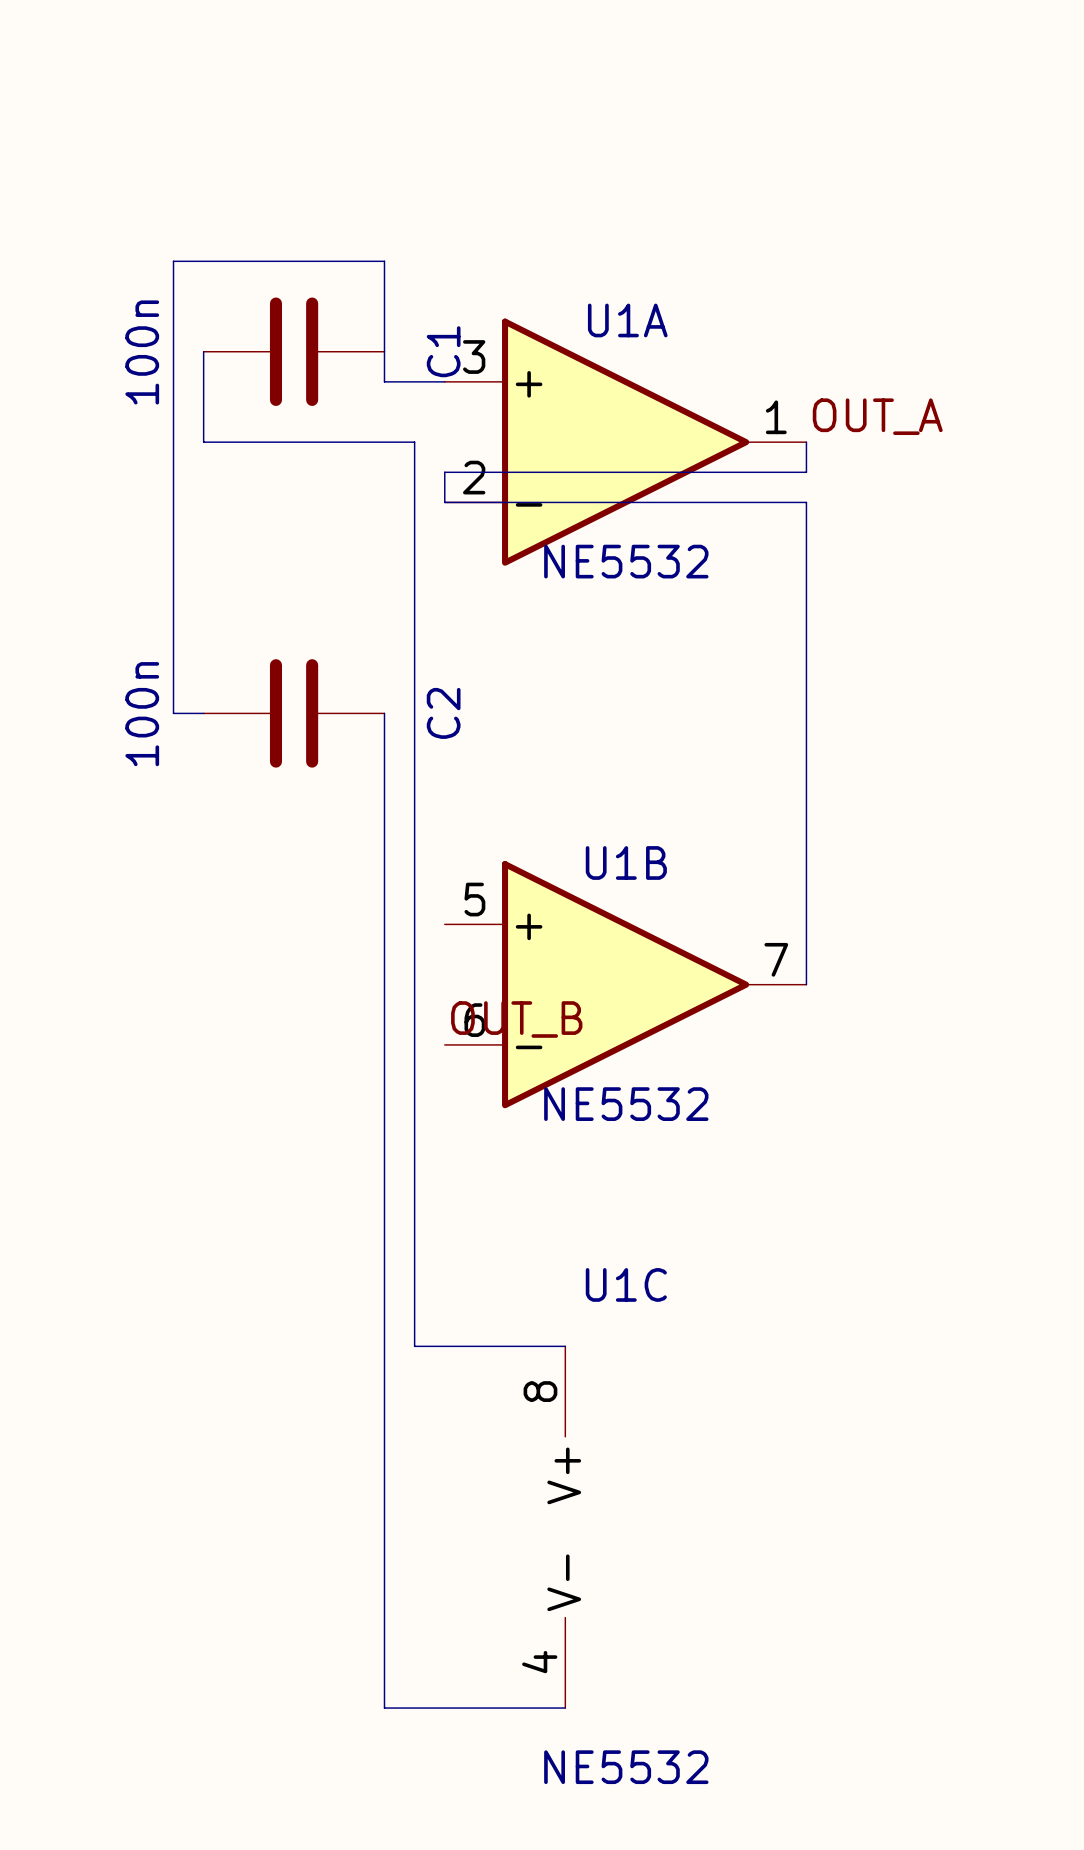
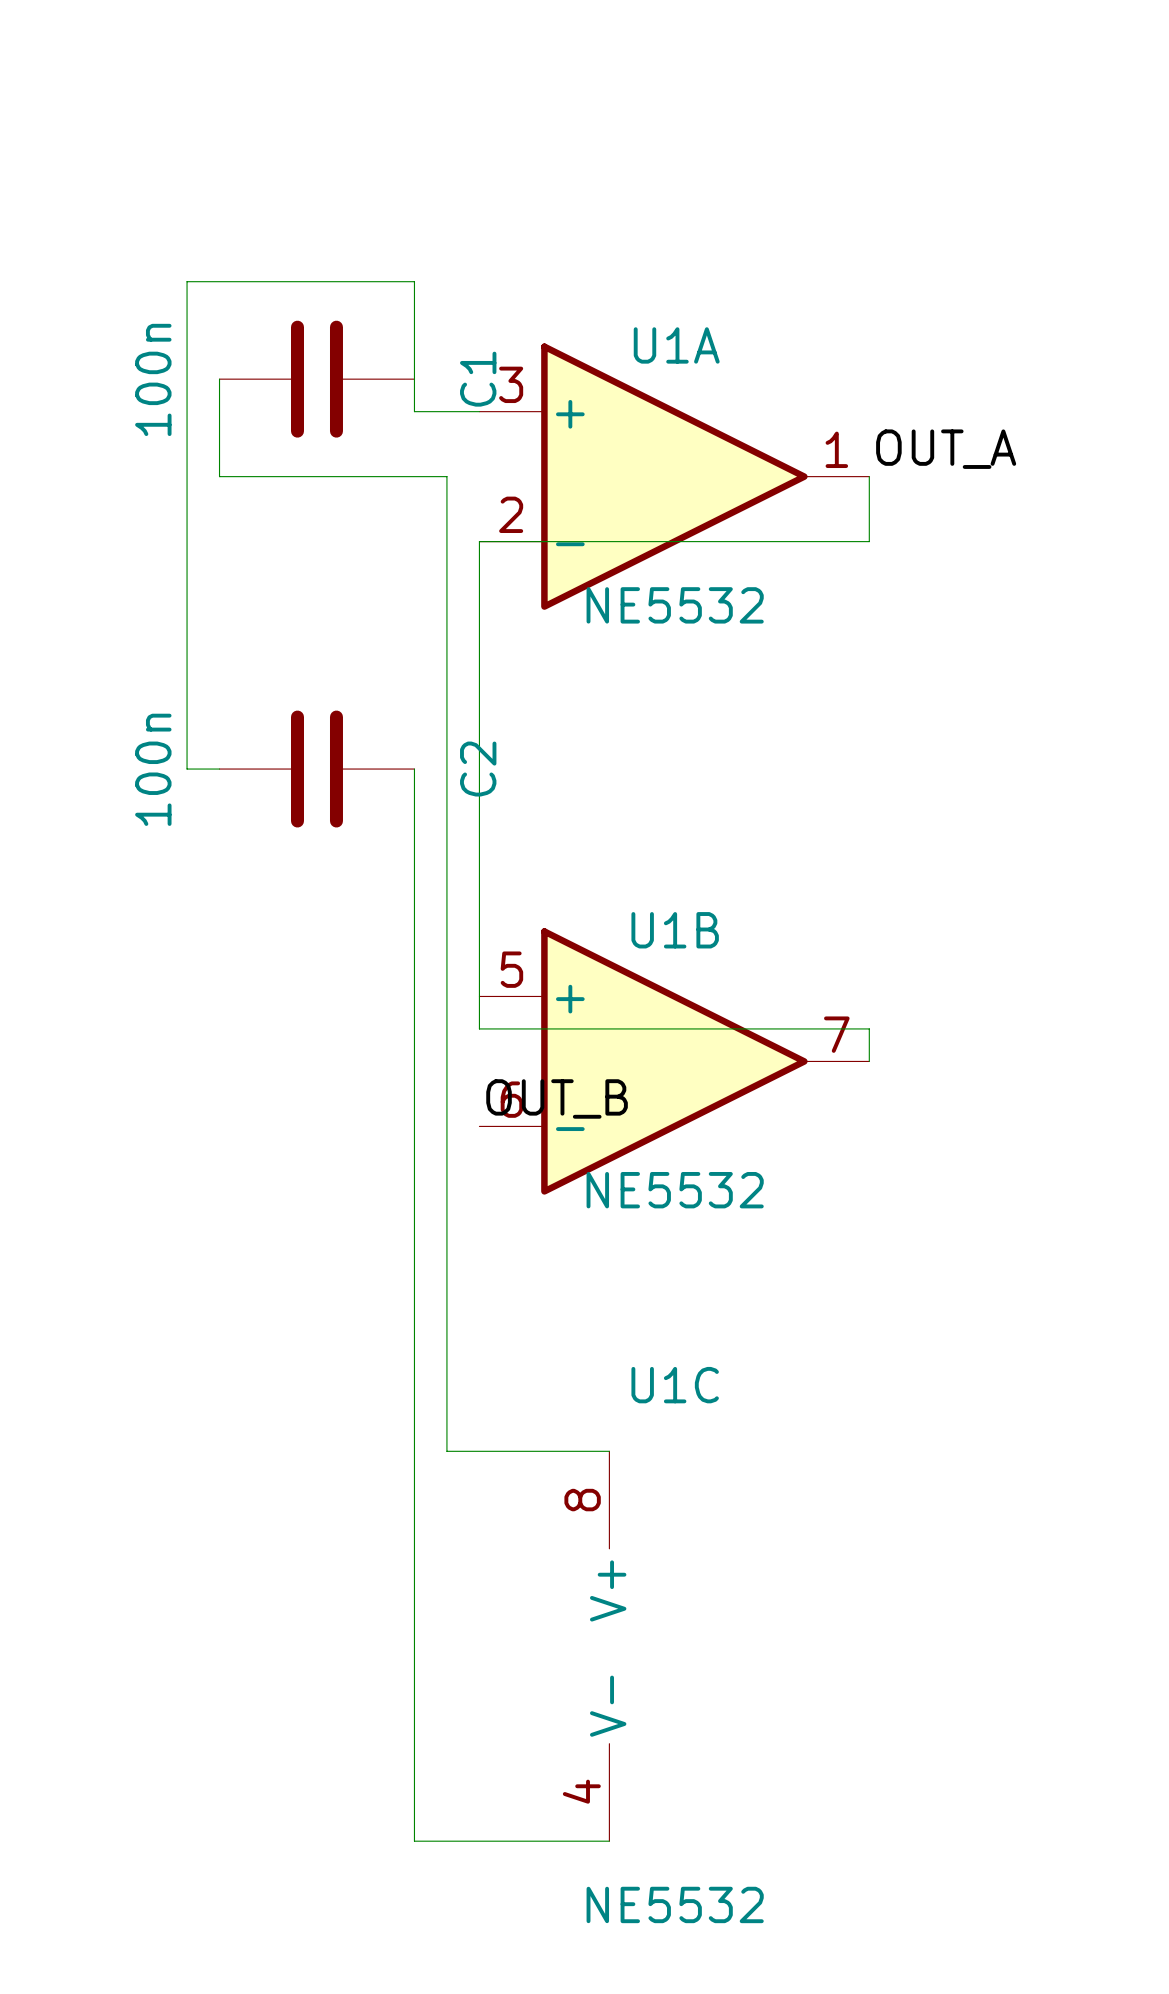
wire: (806, 472) (444, 472) (444, 502) -> (869, 509) (869, 541)
wire: (806, 502) (806, 954) -> (479, 541) (479, 1028) (869, 1028)

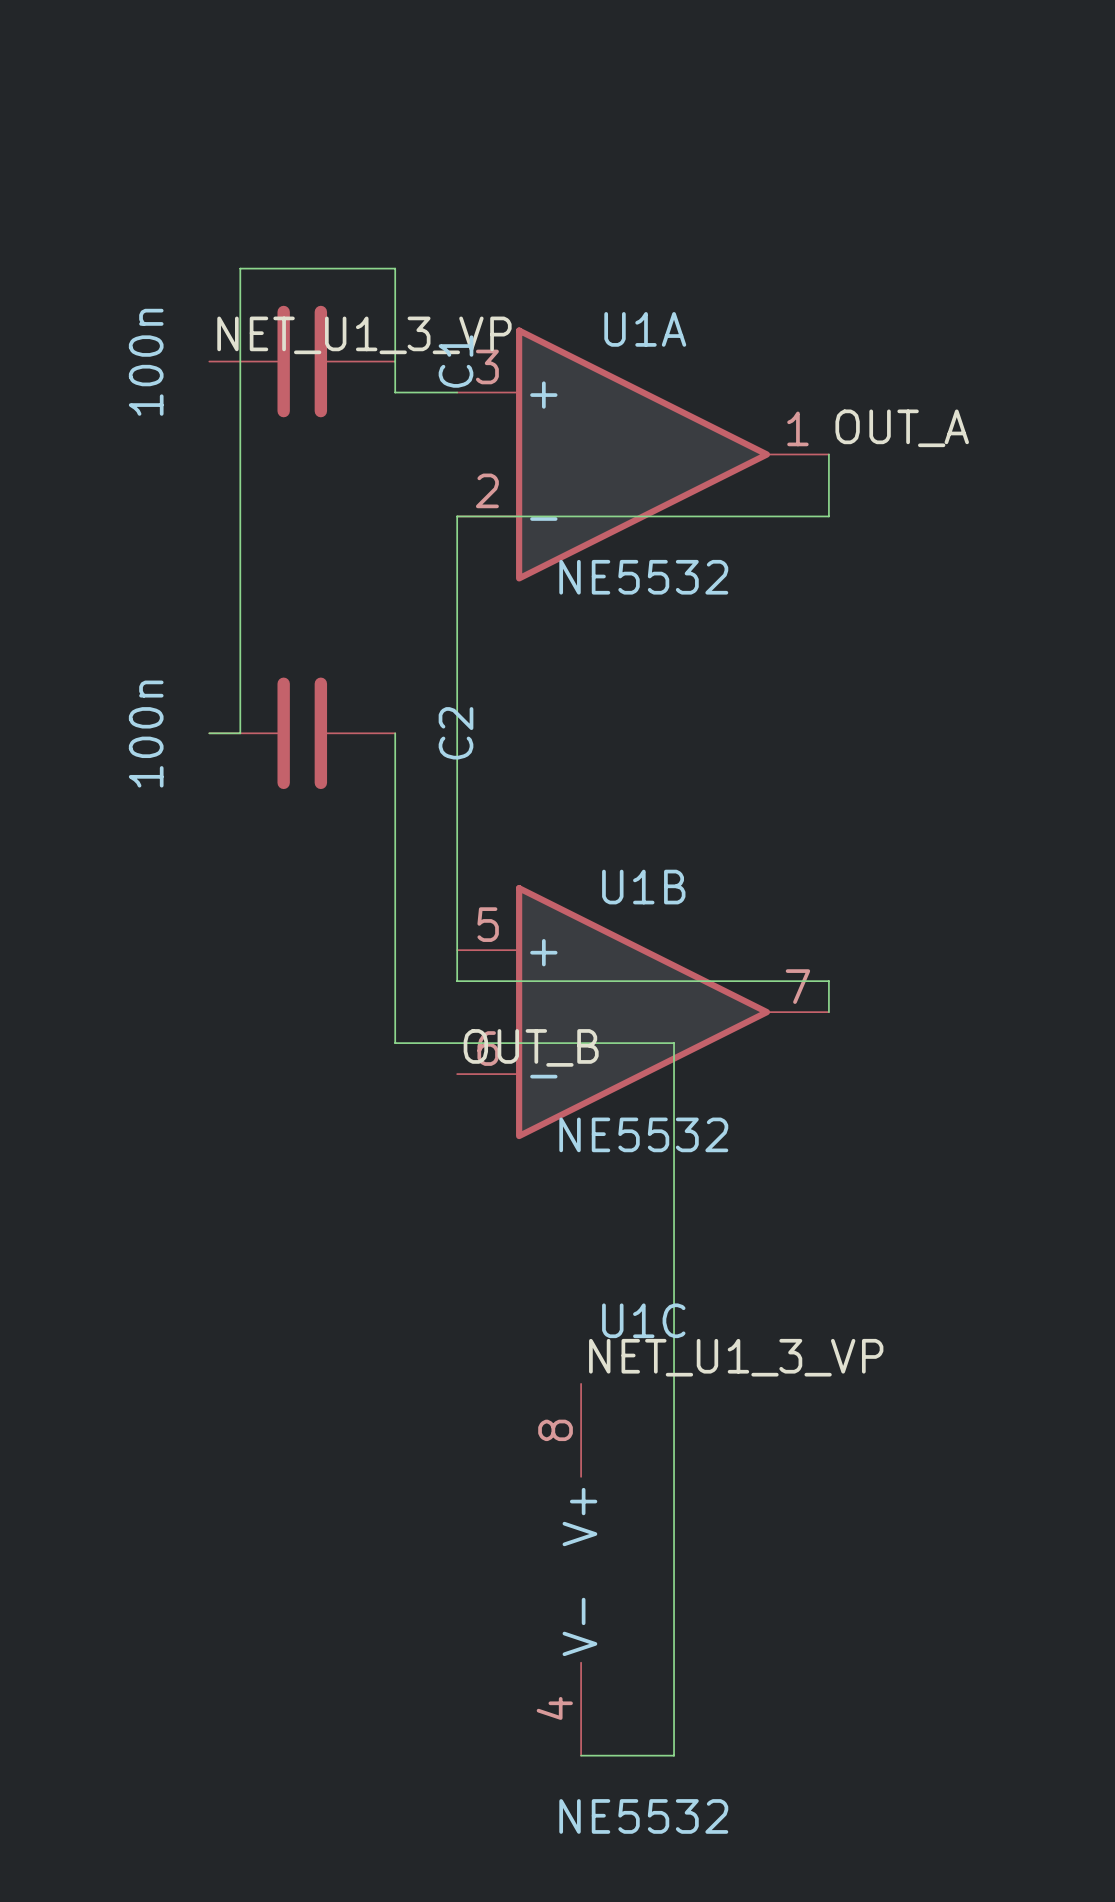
wire: (252, 281) (187, 281) (187, 769) (219, 769) -> (240, 268) (240, 733) (209, 733)
label: none -> NET_U1_3_VP (364, 335)
wire: (219, 379) (219, 476) (446, 476) (446, 1451) (609, 1451) -> none
wire: (414, 1093) (414, 1841) (609, 1841) -> (395, 1043) (674, 1043) (674, 1755) (581, 1755)
label: none -> NET_U1_3_VP (736, 1357)

